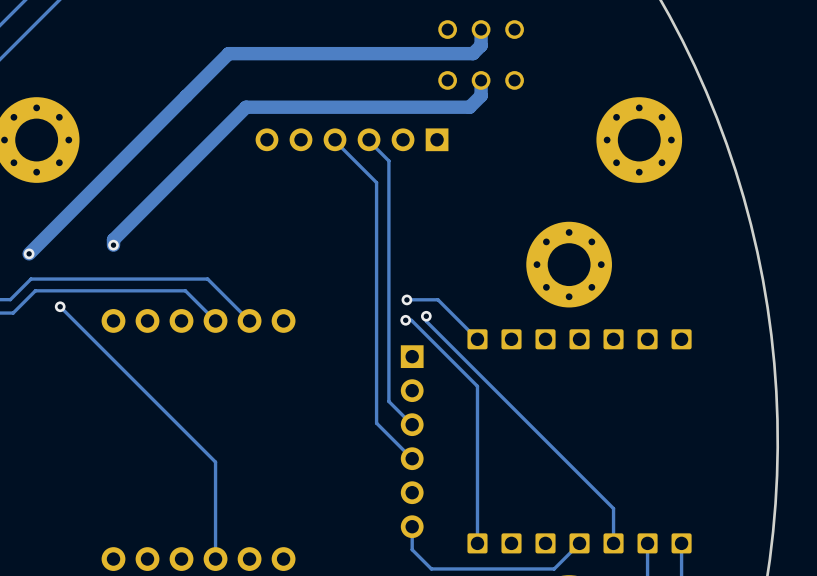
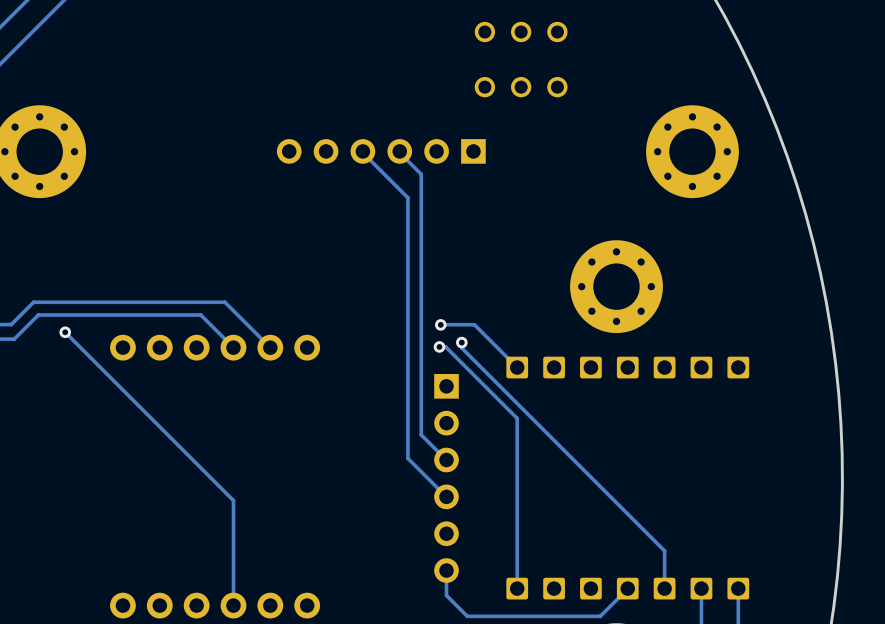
track: (481, 29) (481, 45) (473, 53) (228, 53) (29, 253) -> none
track: (481, 80) (481, 95) (469, 107) (246, 107) (113, 239) (113, 245) -> none
via: (113, 245) -> none
via: (29, 253) -> none

